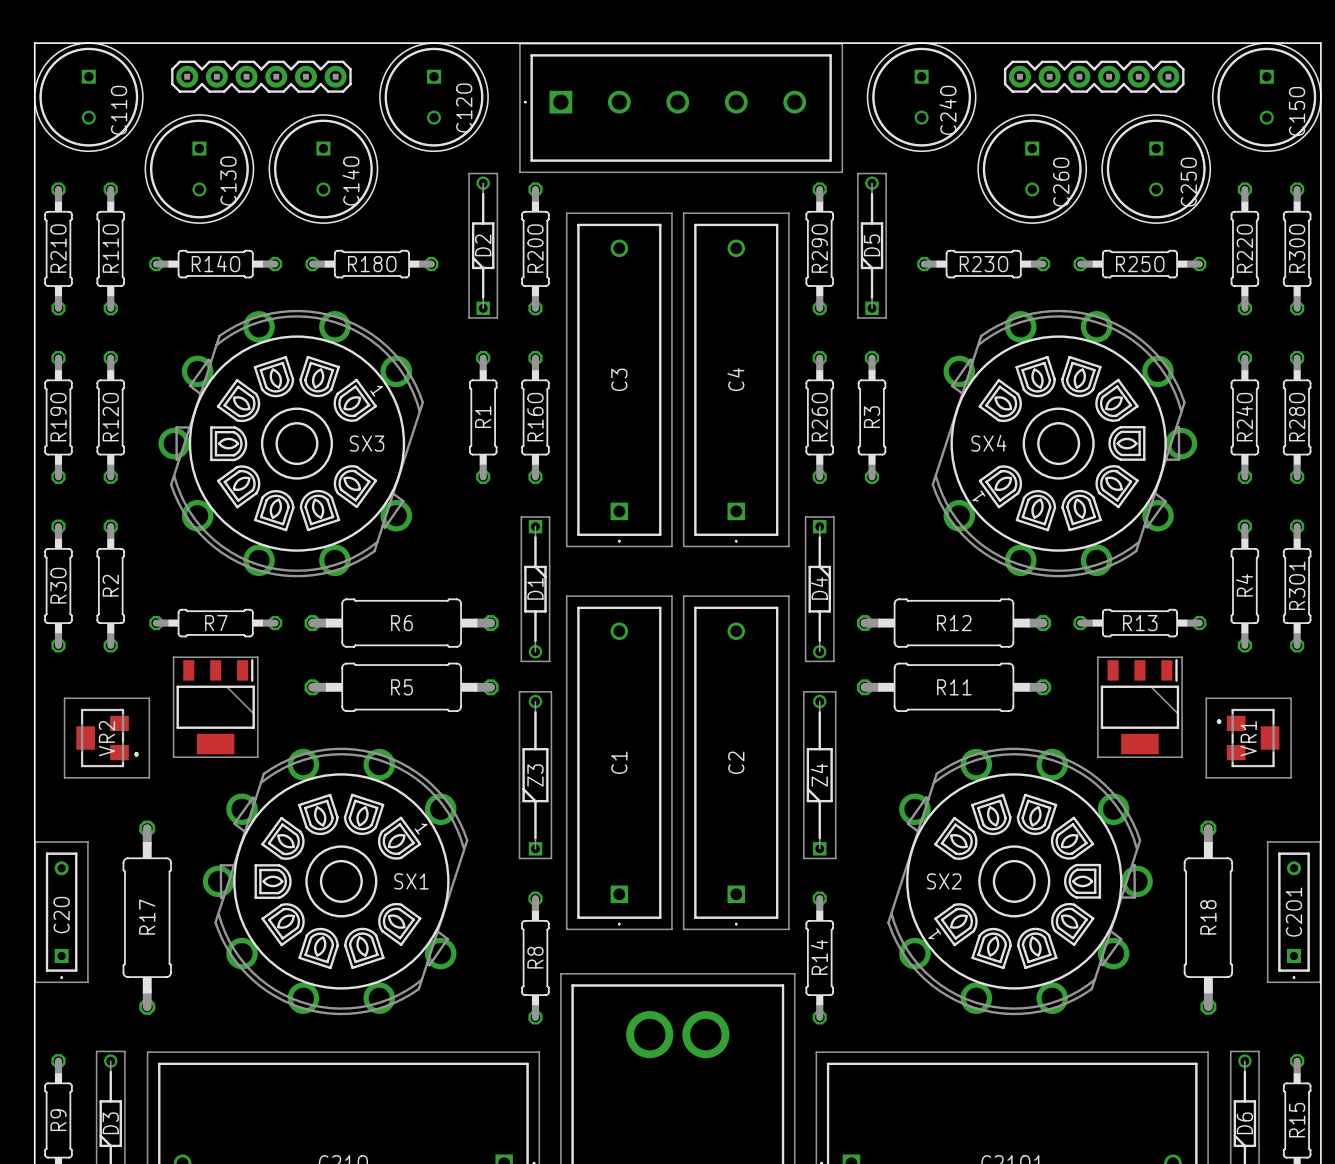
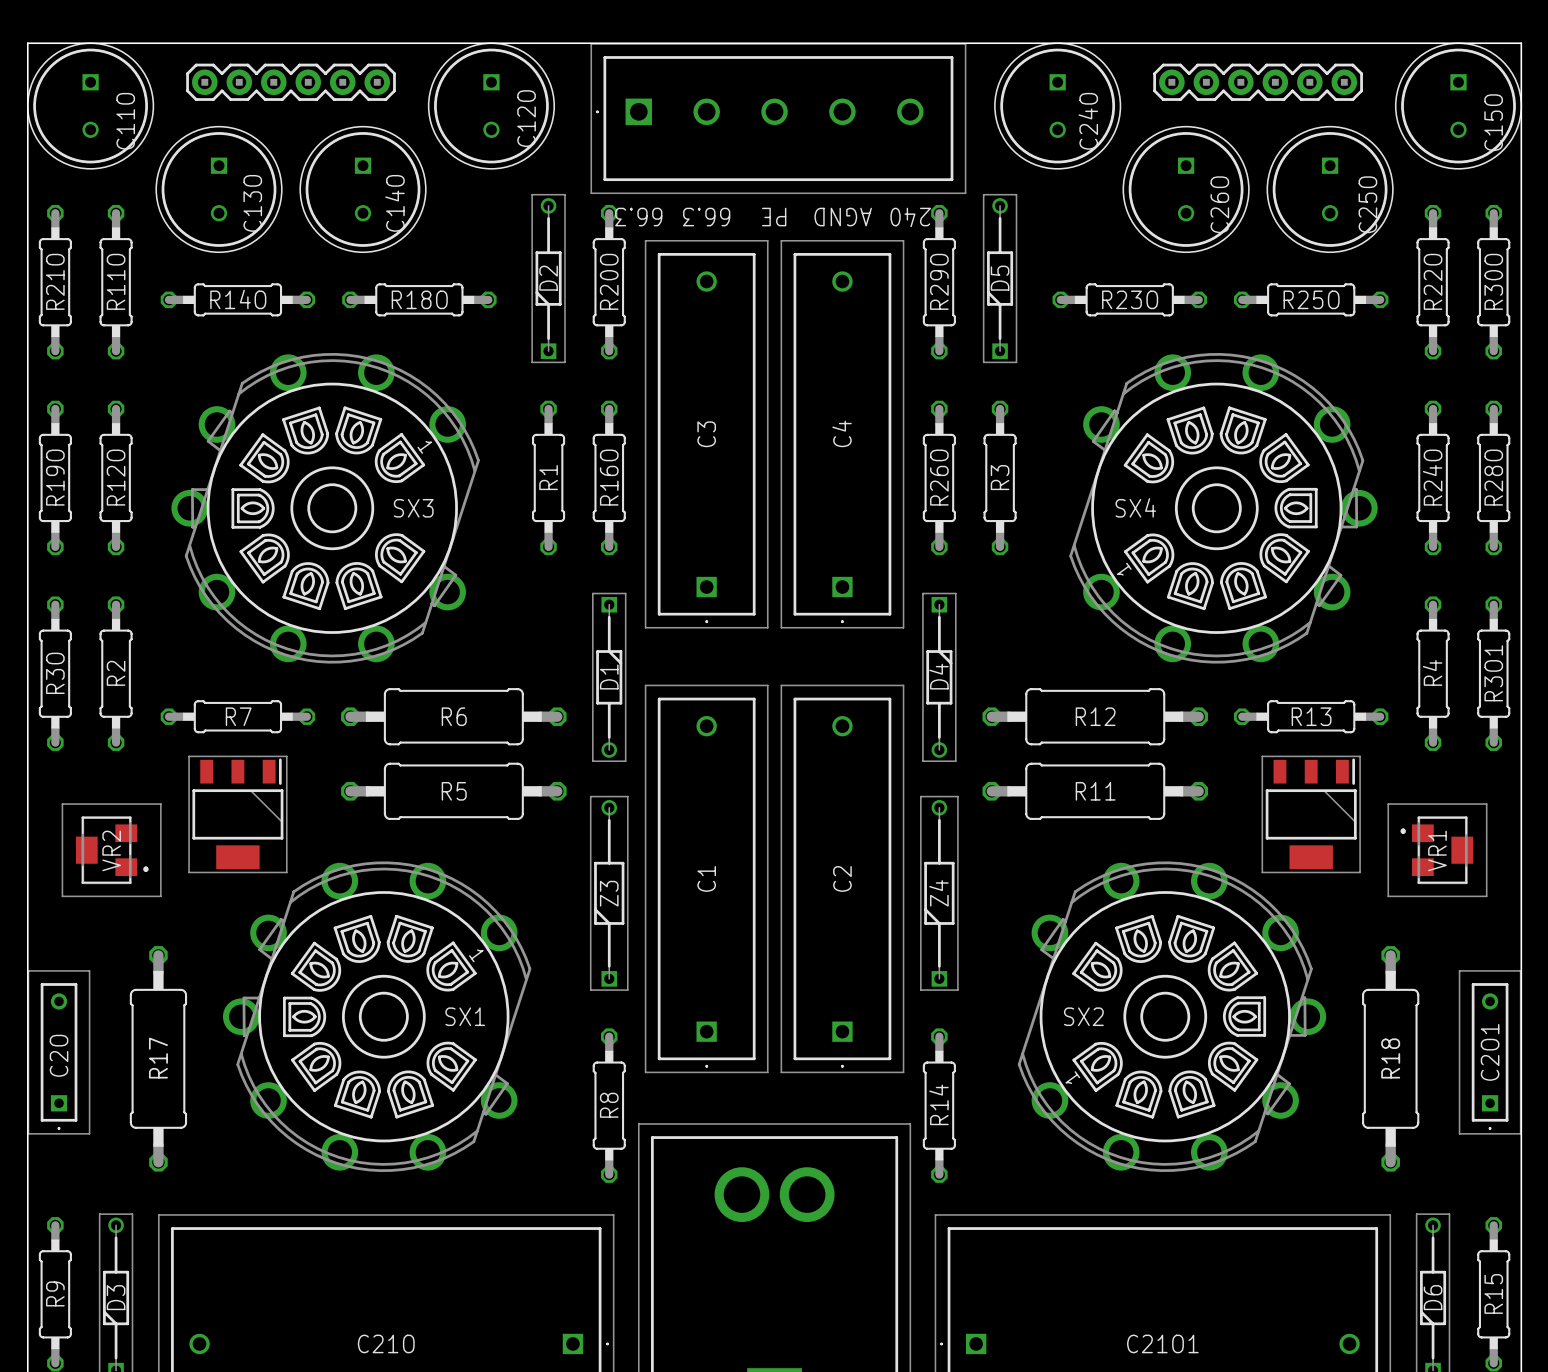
text: none -> 66.3 (638, 217)
text: none -> 66.3 (706, 217)
text: none -> PE (774, 217)
text: none -> AGND (843, 217)
text: none -> 240 (910, 217)

